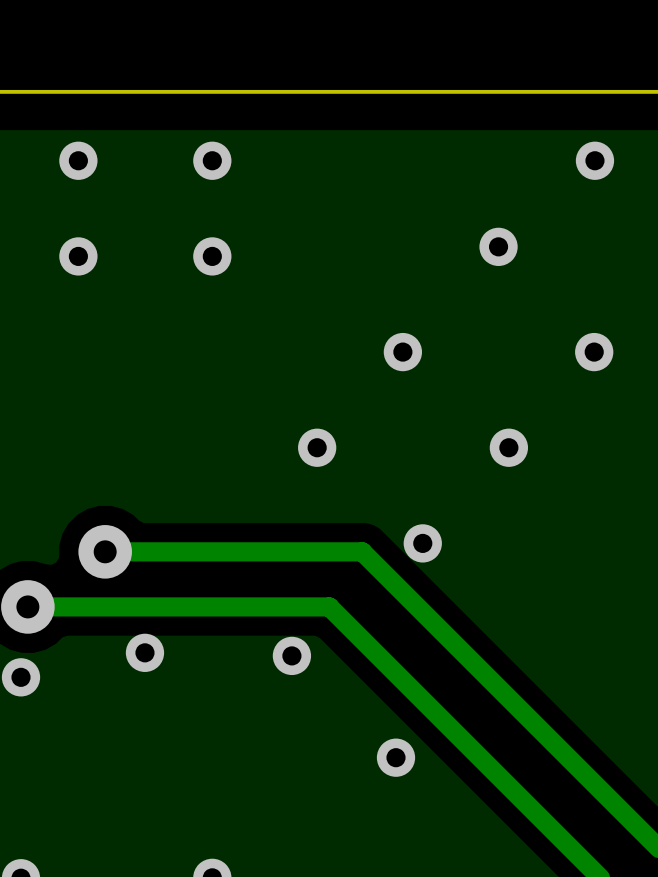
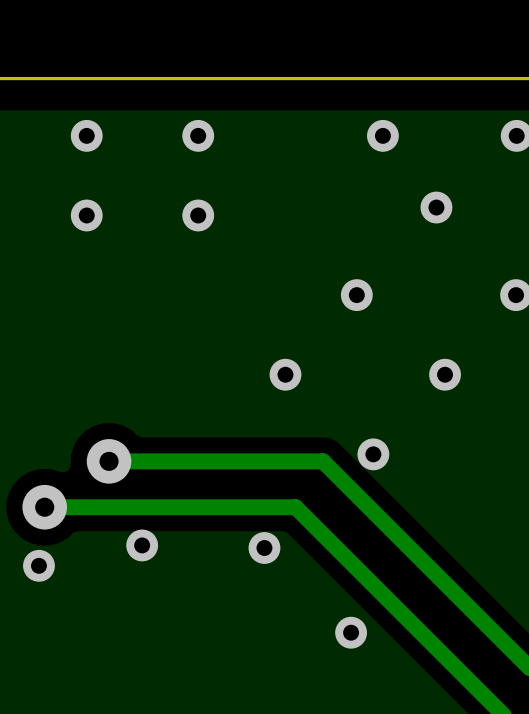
via: none -> (382, 135)

